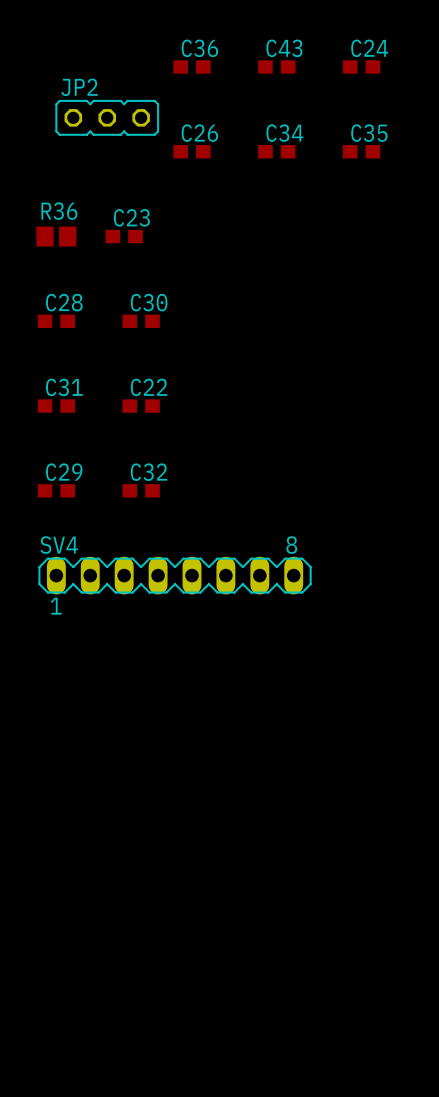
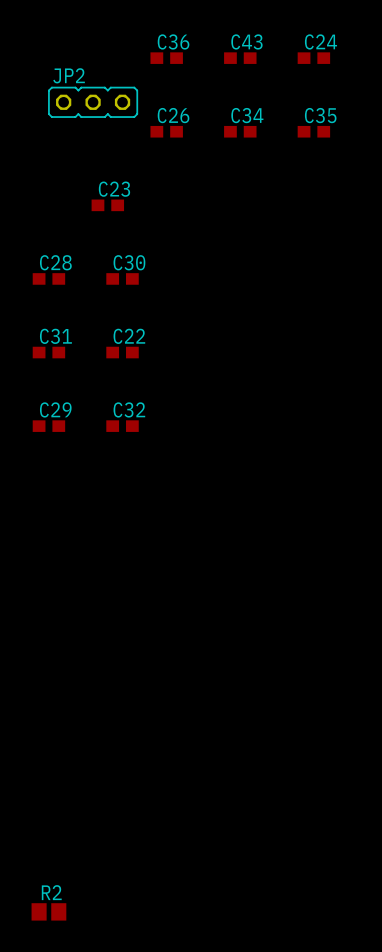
R36: (56, 236) -> none
SV4: (175, 575) -> none
R2: none -> (48, 911)

